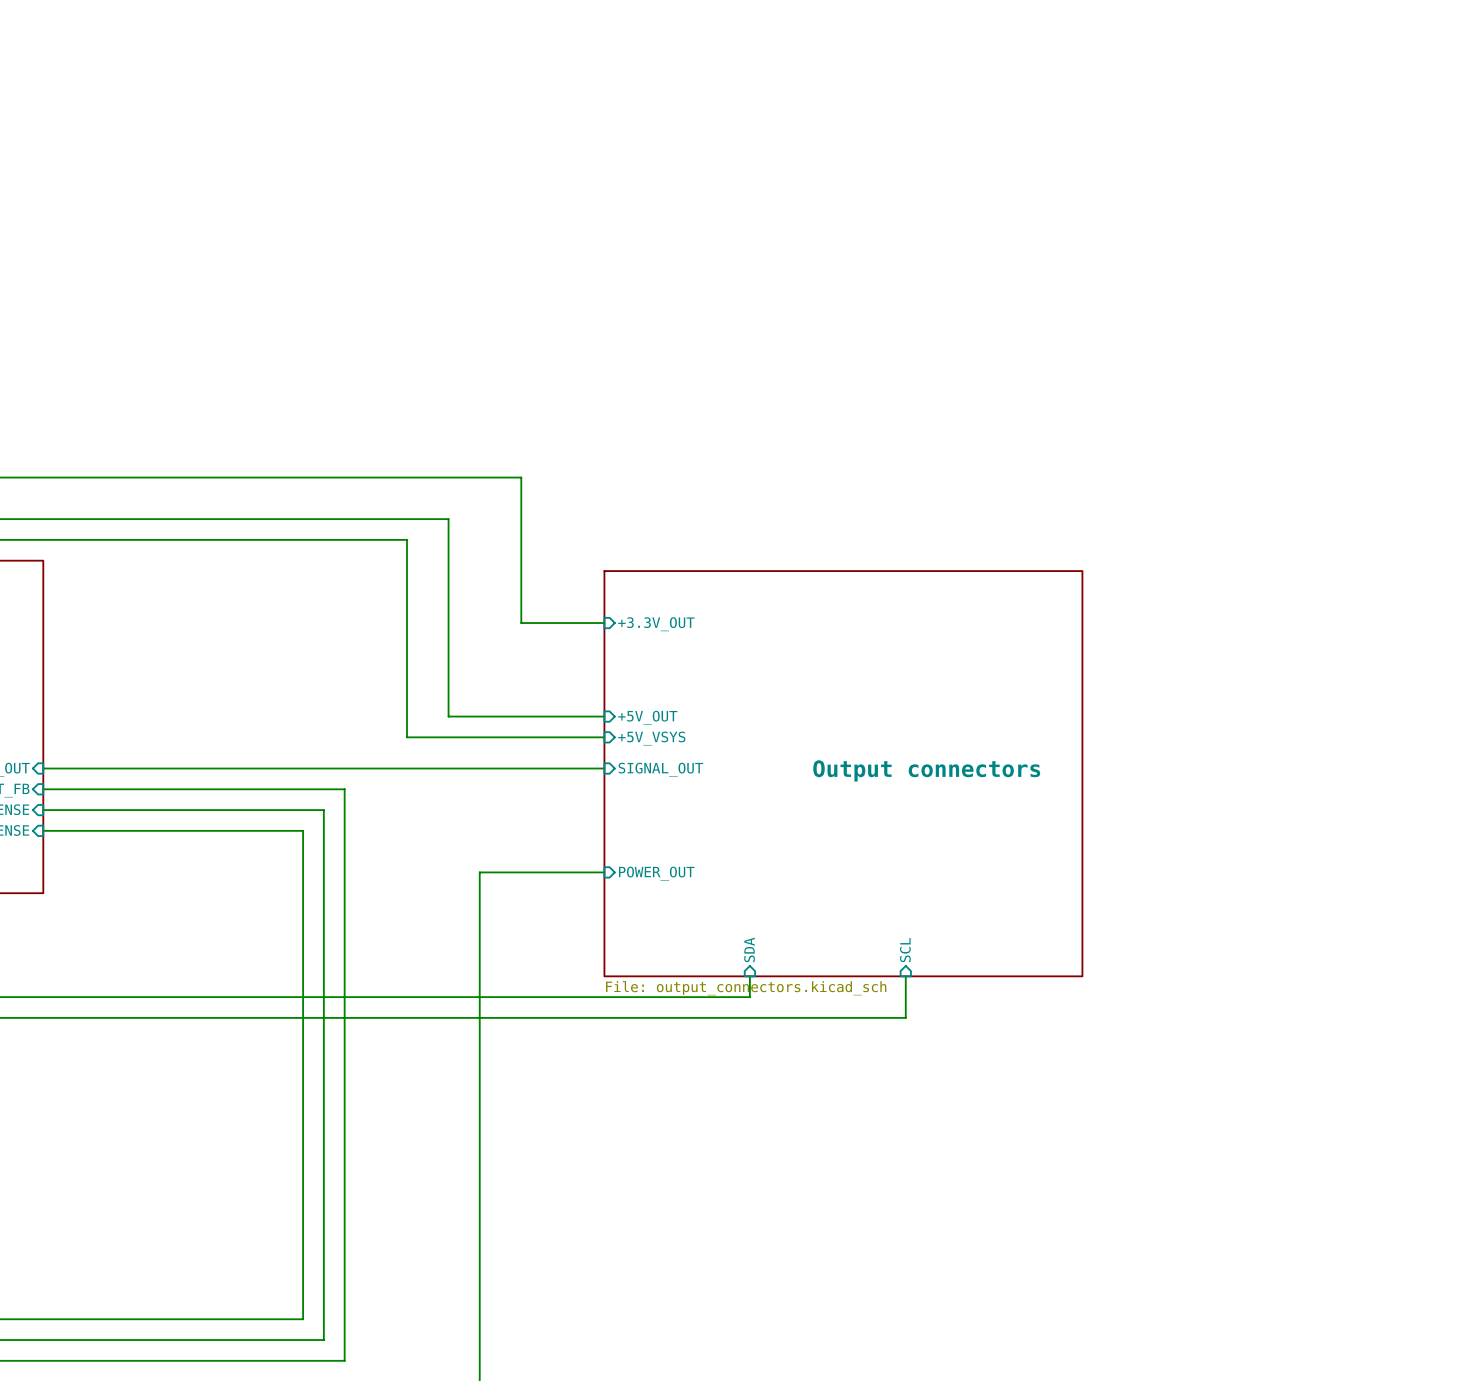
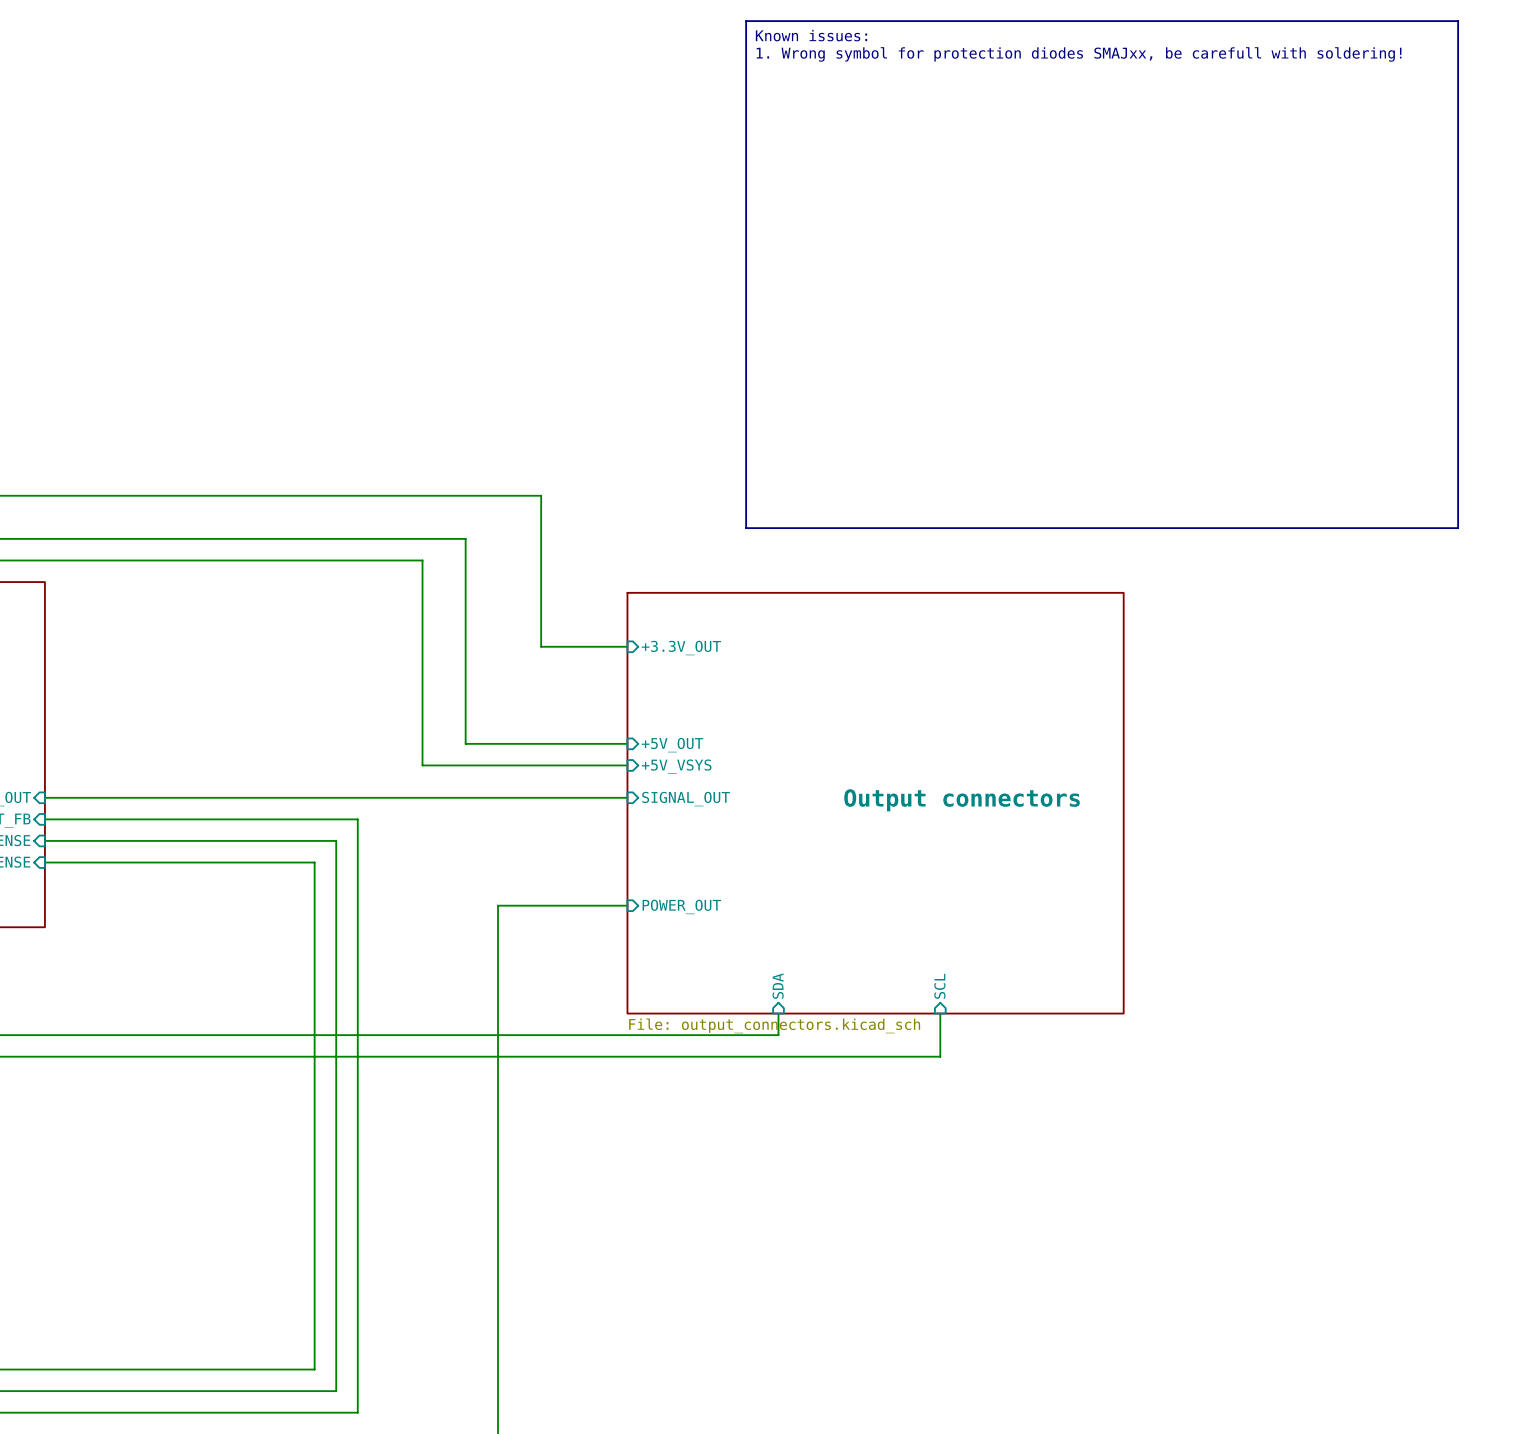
line: none -> (746, 21) (1458, 21) (1458, 528) (746, 528) (746, 21)
text: none -> Known issues: (811, 35)
text: none -> 1. Wrong symbol for protection diodes SMAJxx, be carefull with soldering! (1079, 54)

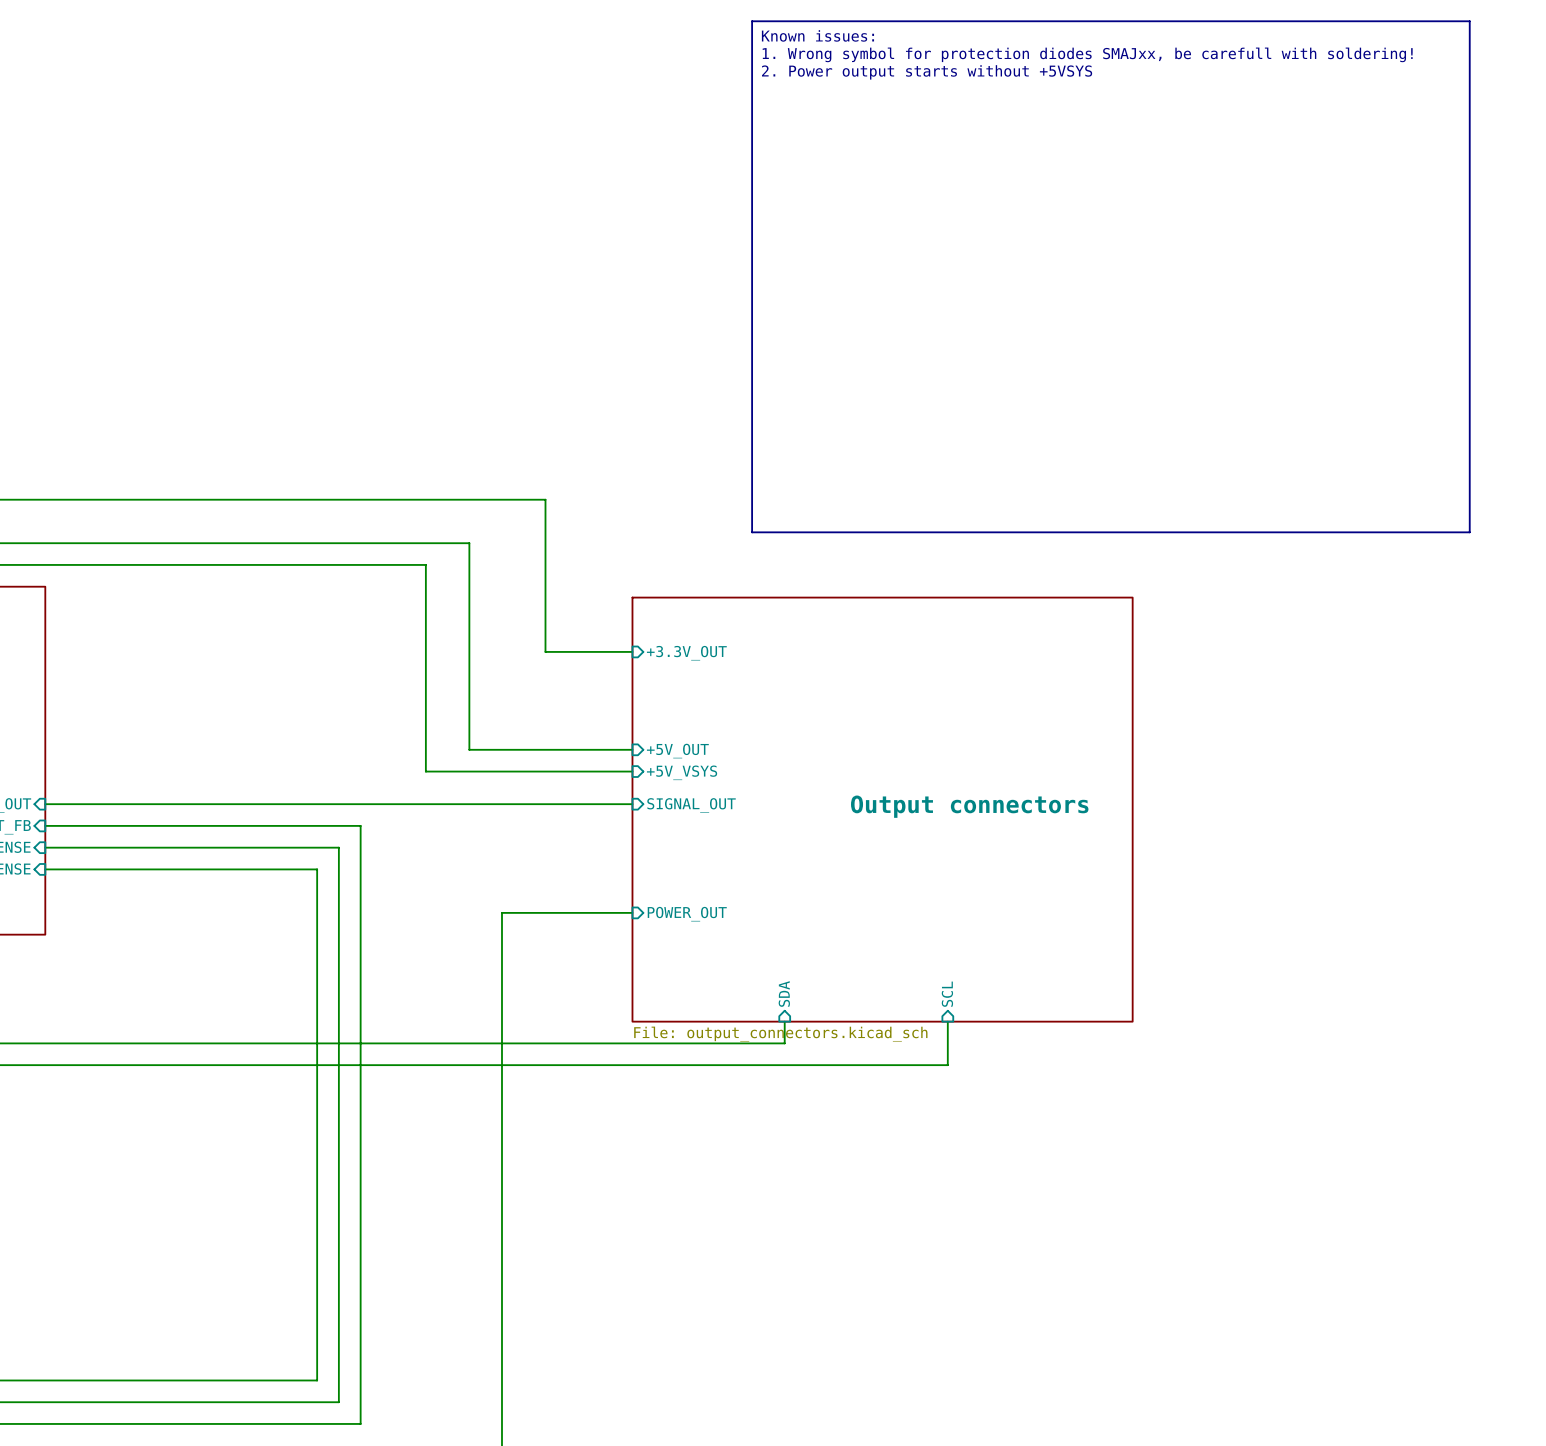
text: none -> 2. Power output starts without +5VSYS (927, 72)

